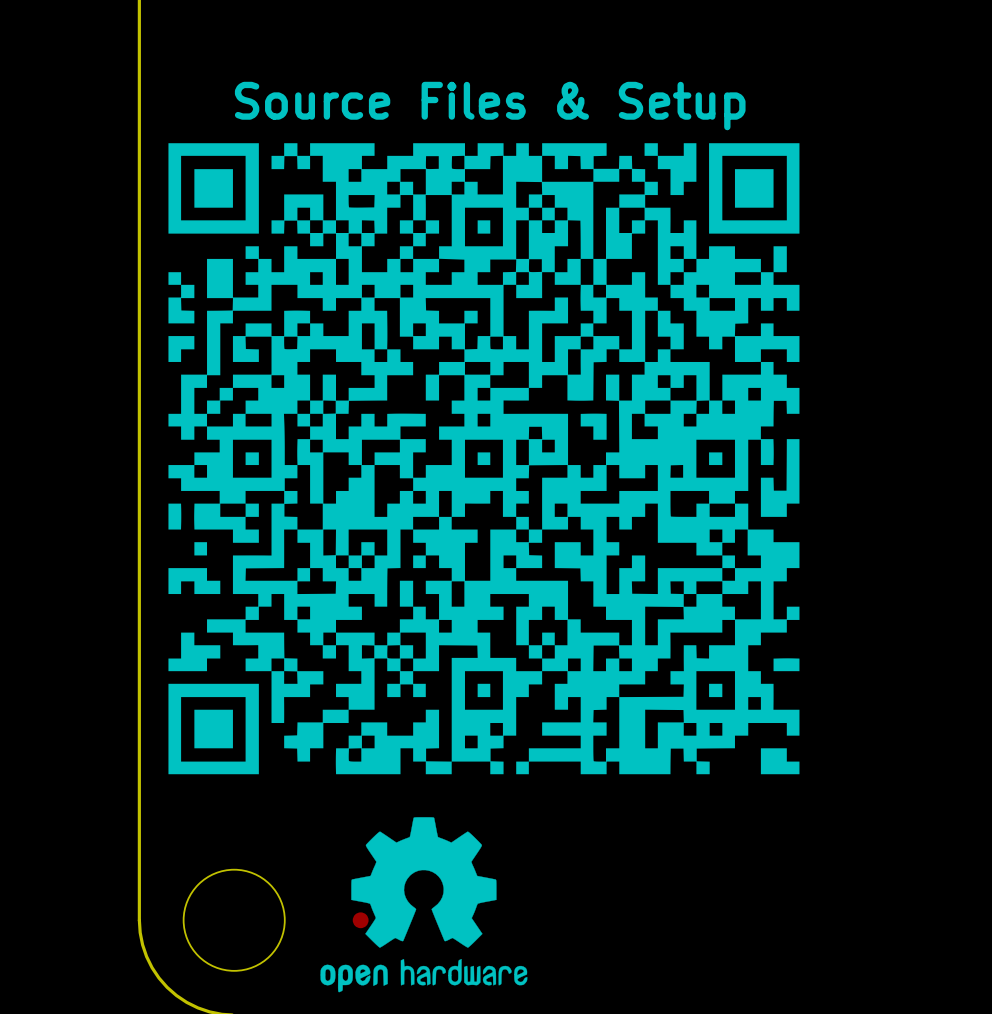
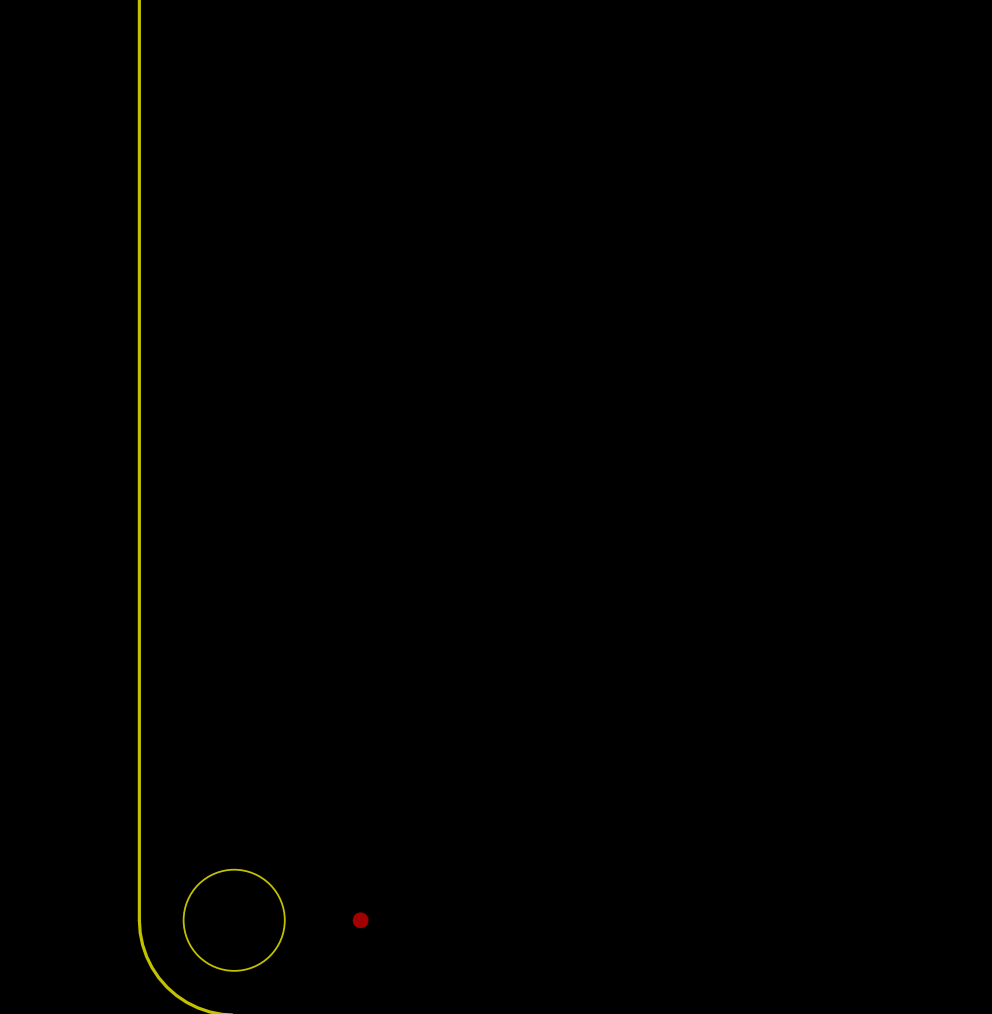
text: Source Files & Setup (490, 106) -> none
drawing: [168, 143, 800, 775] -> none
drawing: [320, 817, 528, 993] -> none

